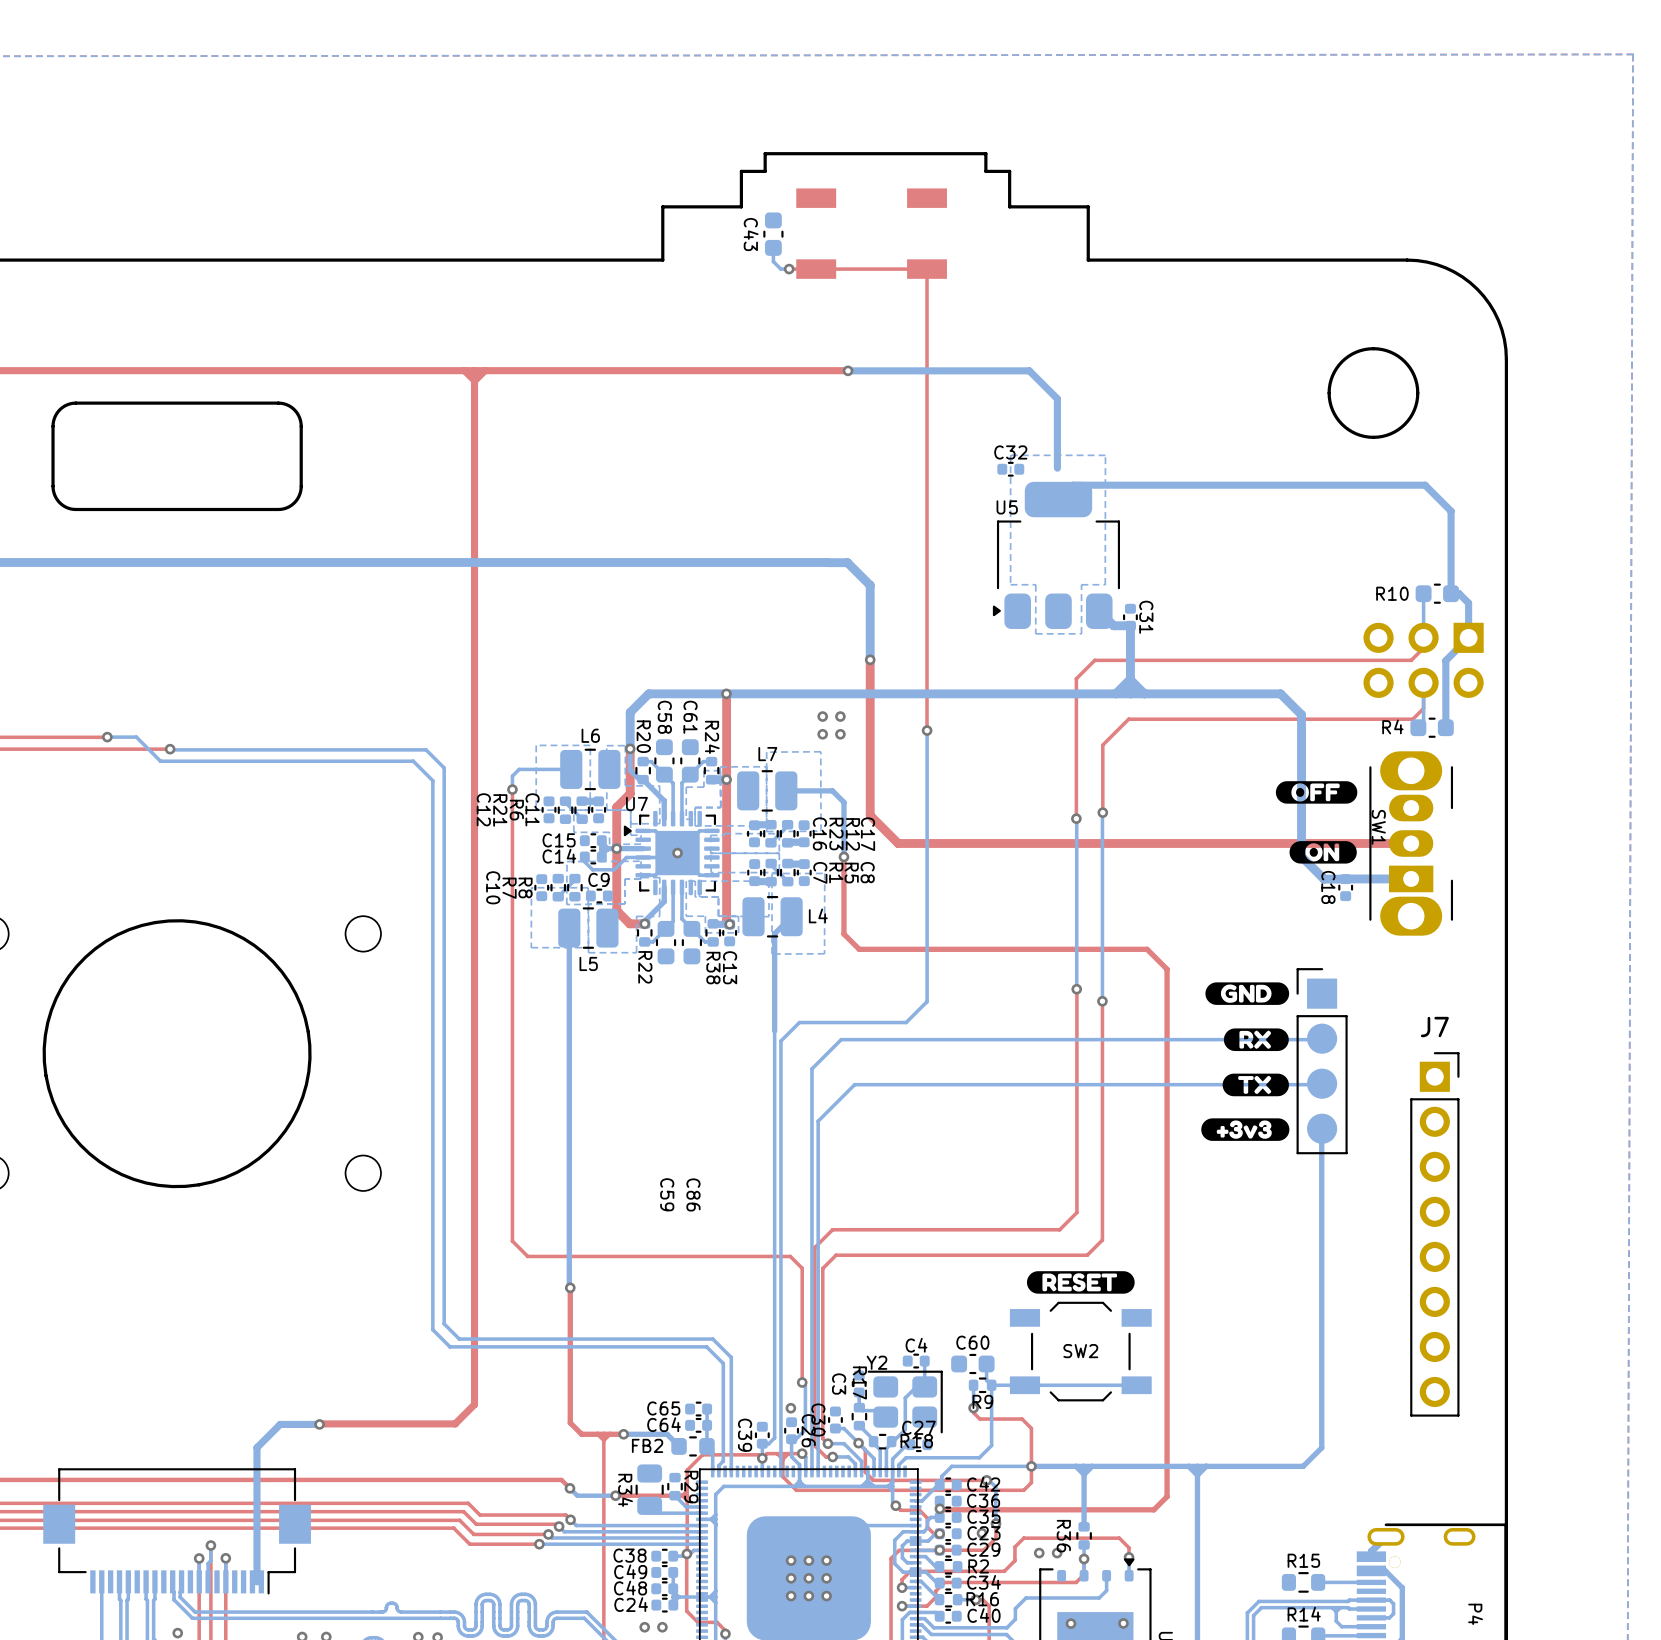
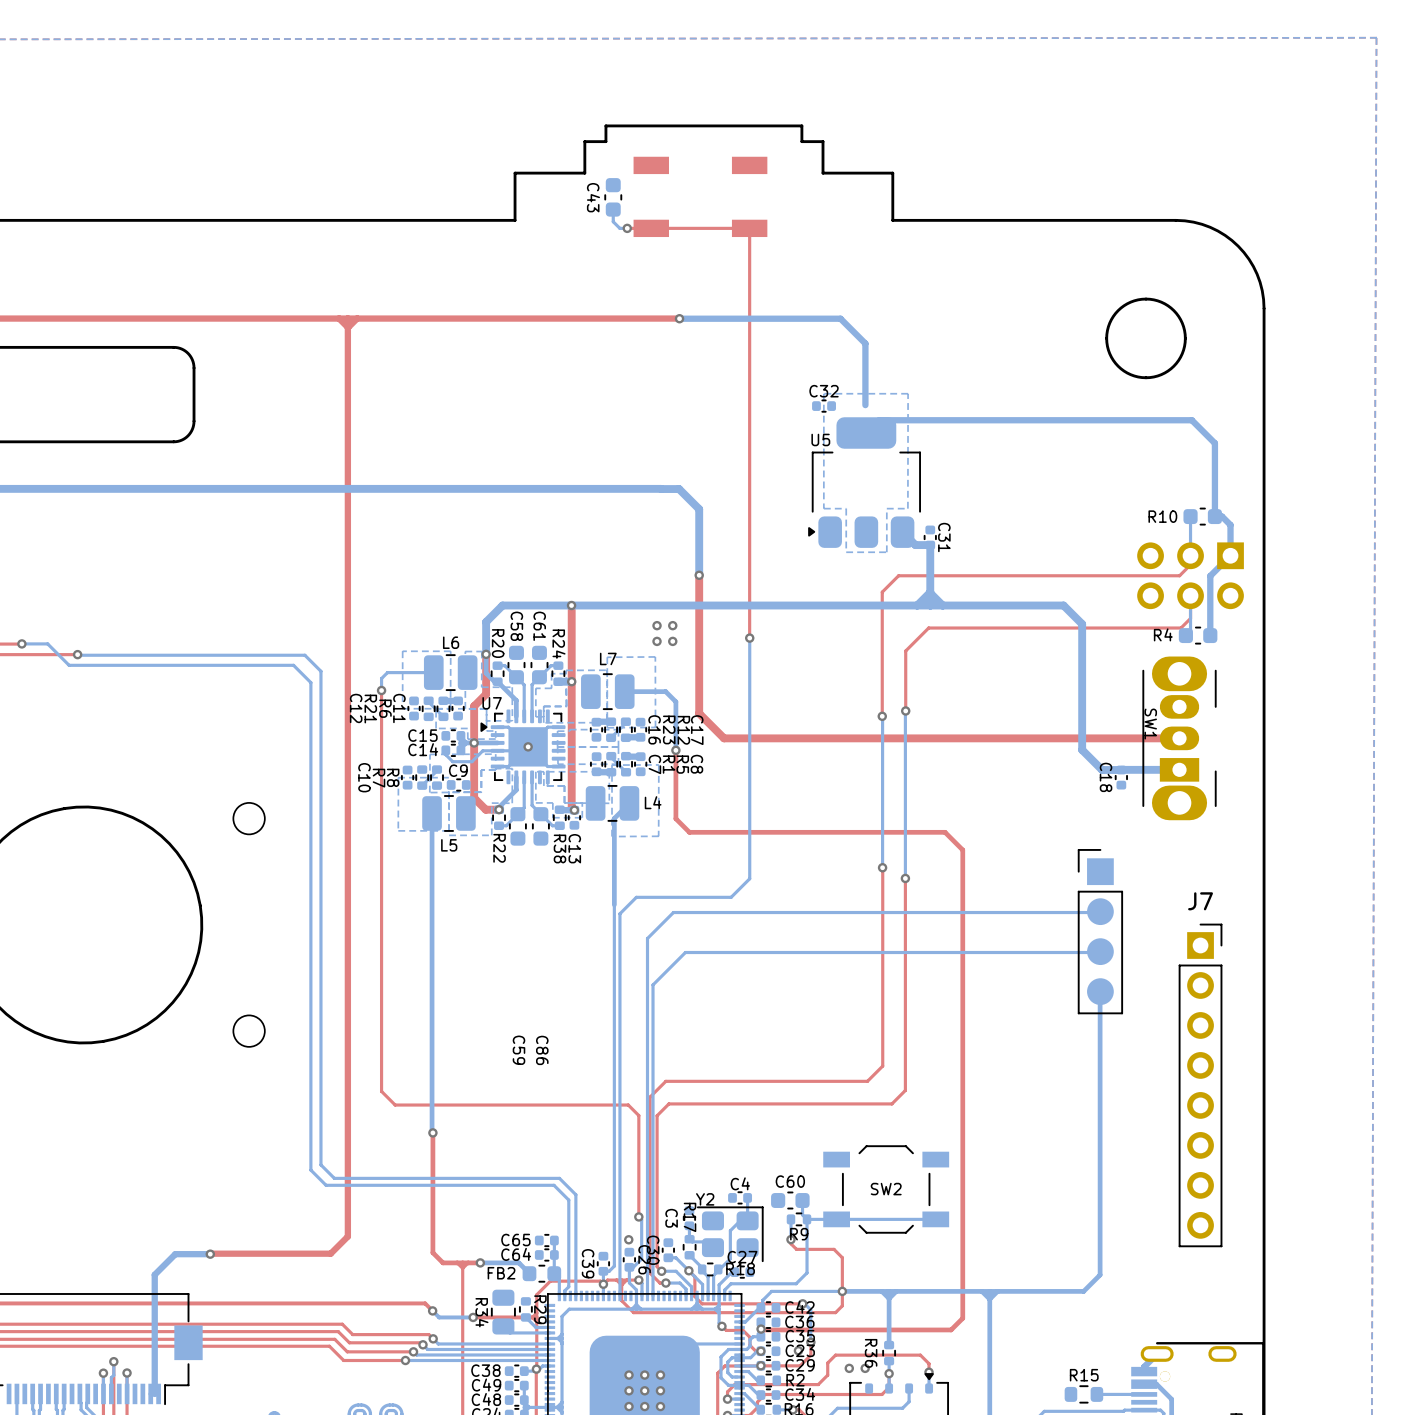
drawing: [1275, 781, 1358, 804] -> none
drawing: [1289, 841, 1357, 864] -> none
drawing: [1205, 982, 1290, 1005] -> none
drawing: [1223, 1028, 1289, 1052] -> none
drawing: [1222, 1073, 1289, 1097] -> none
drawing: [1201, 1118, 1290, 1141] -> none
drawing: [1026, 1271, 1135, 1294] -> none

